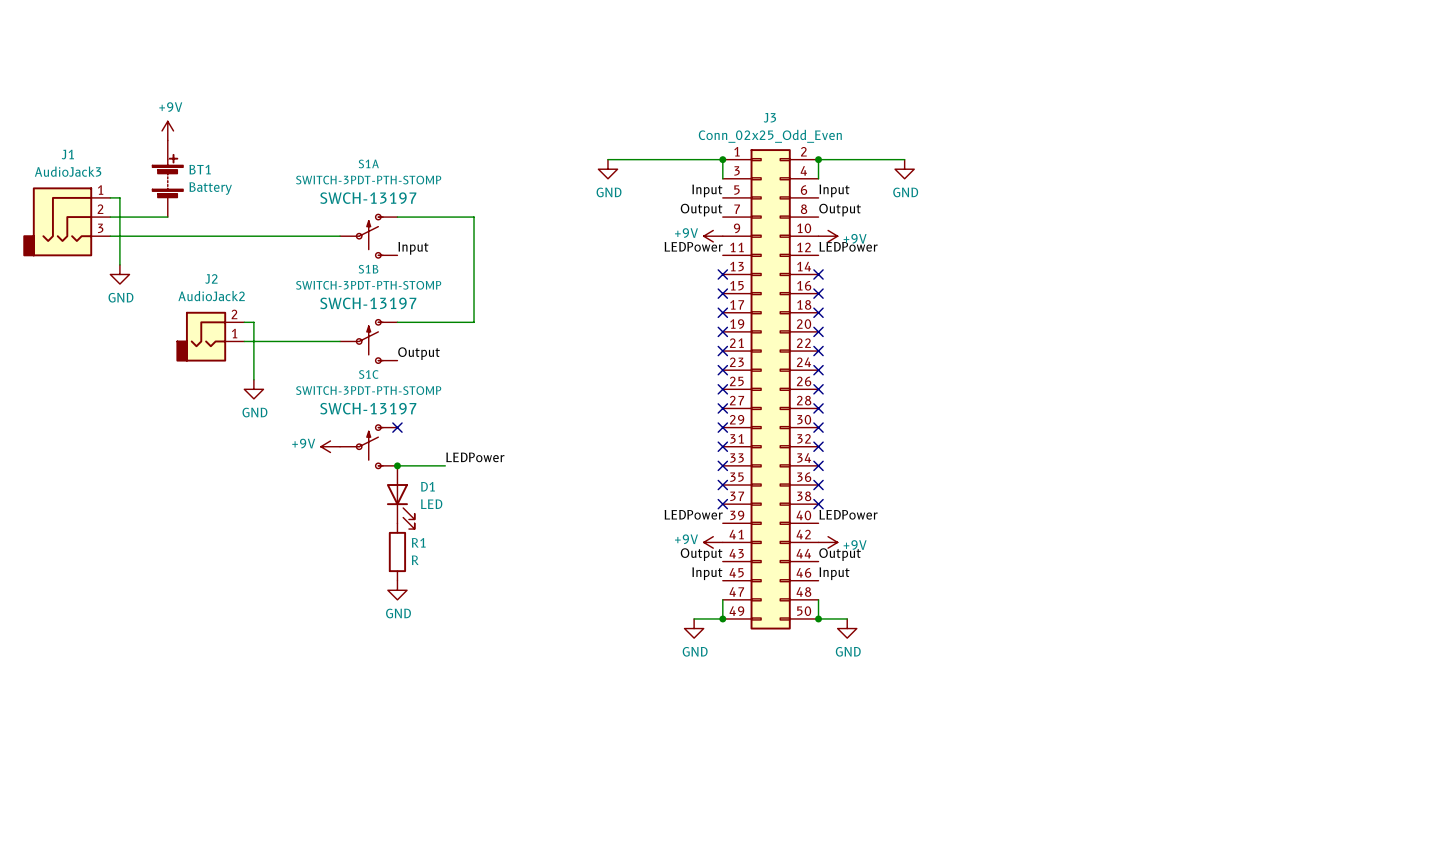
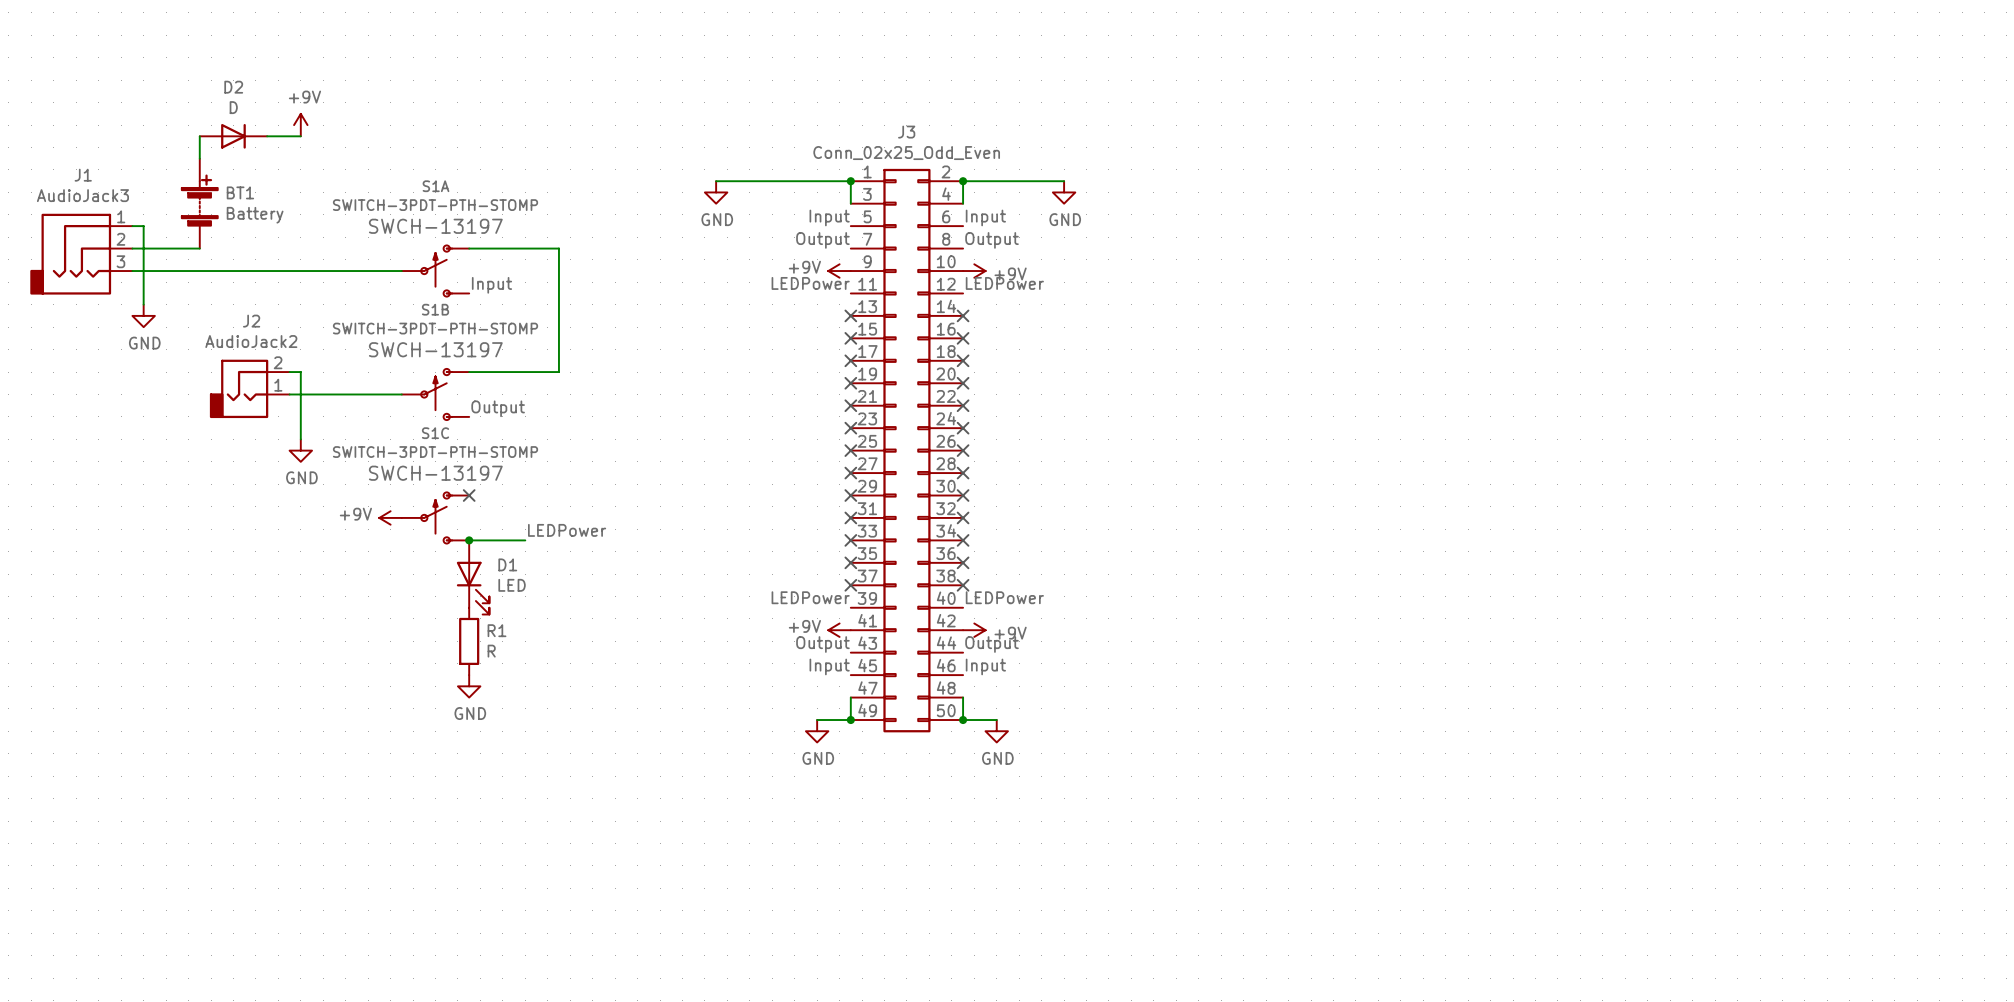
D2: none -> D (233, 136)
wire: none -> (267, 136) (300, 136)
power symbol position: +9V (167, 130) -> +9V (300, 125)

